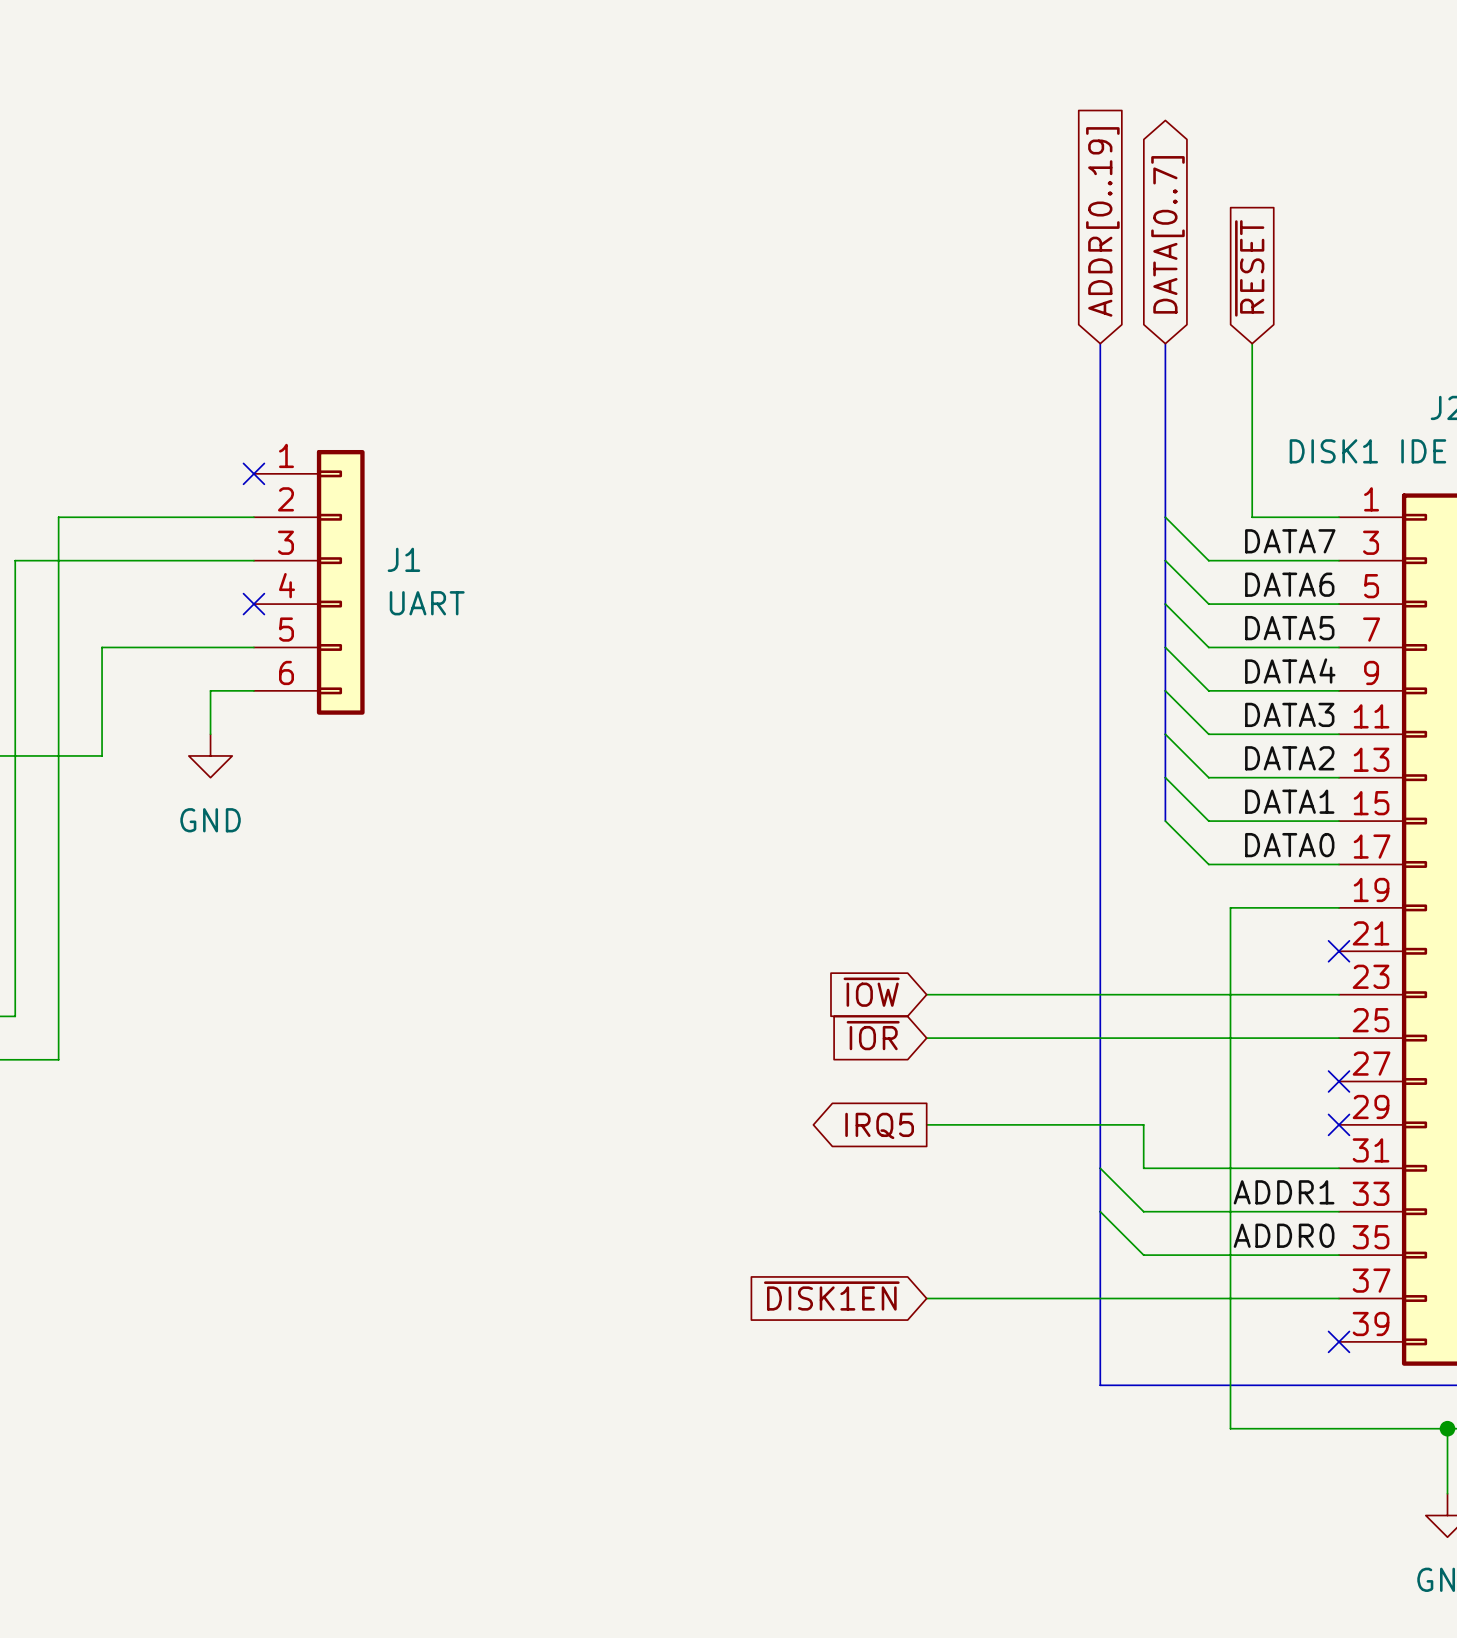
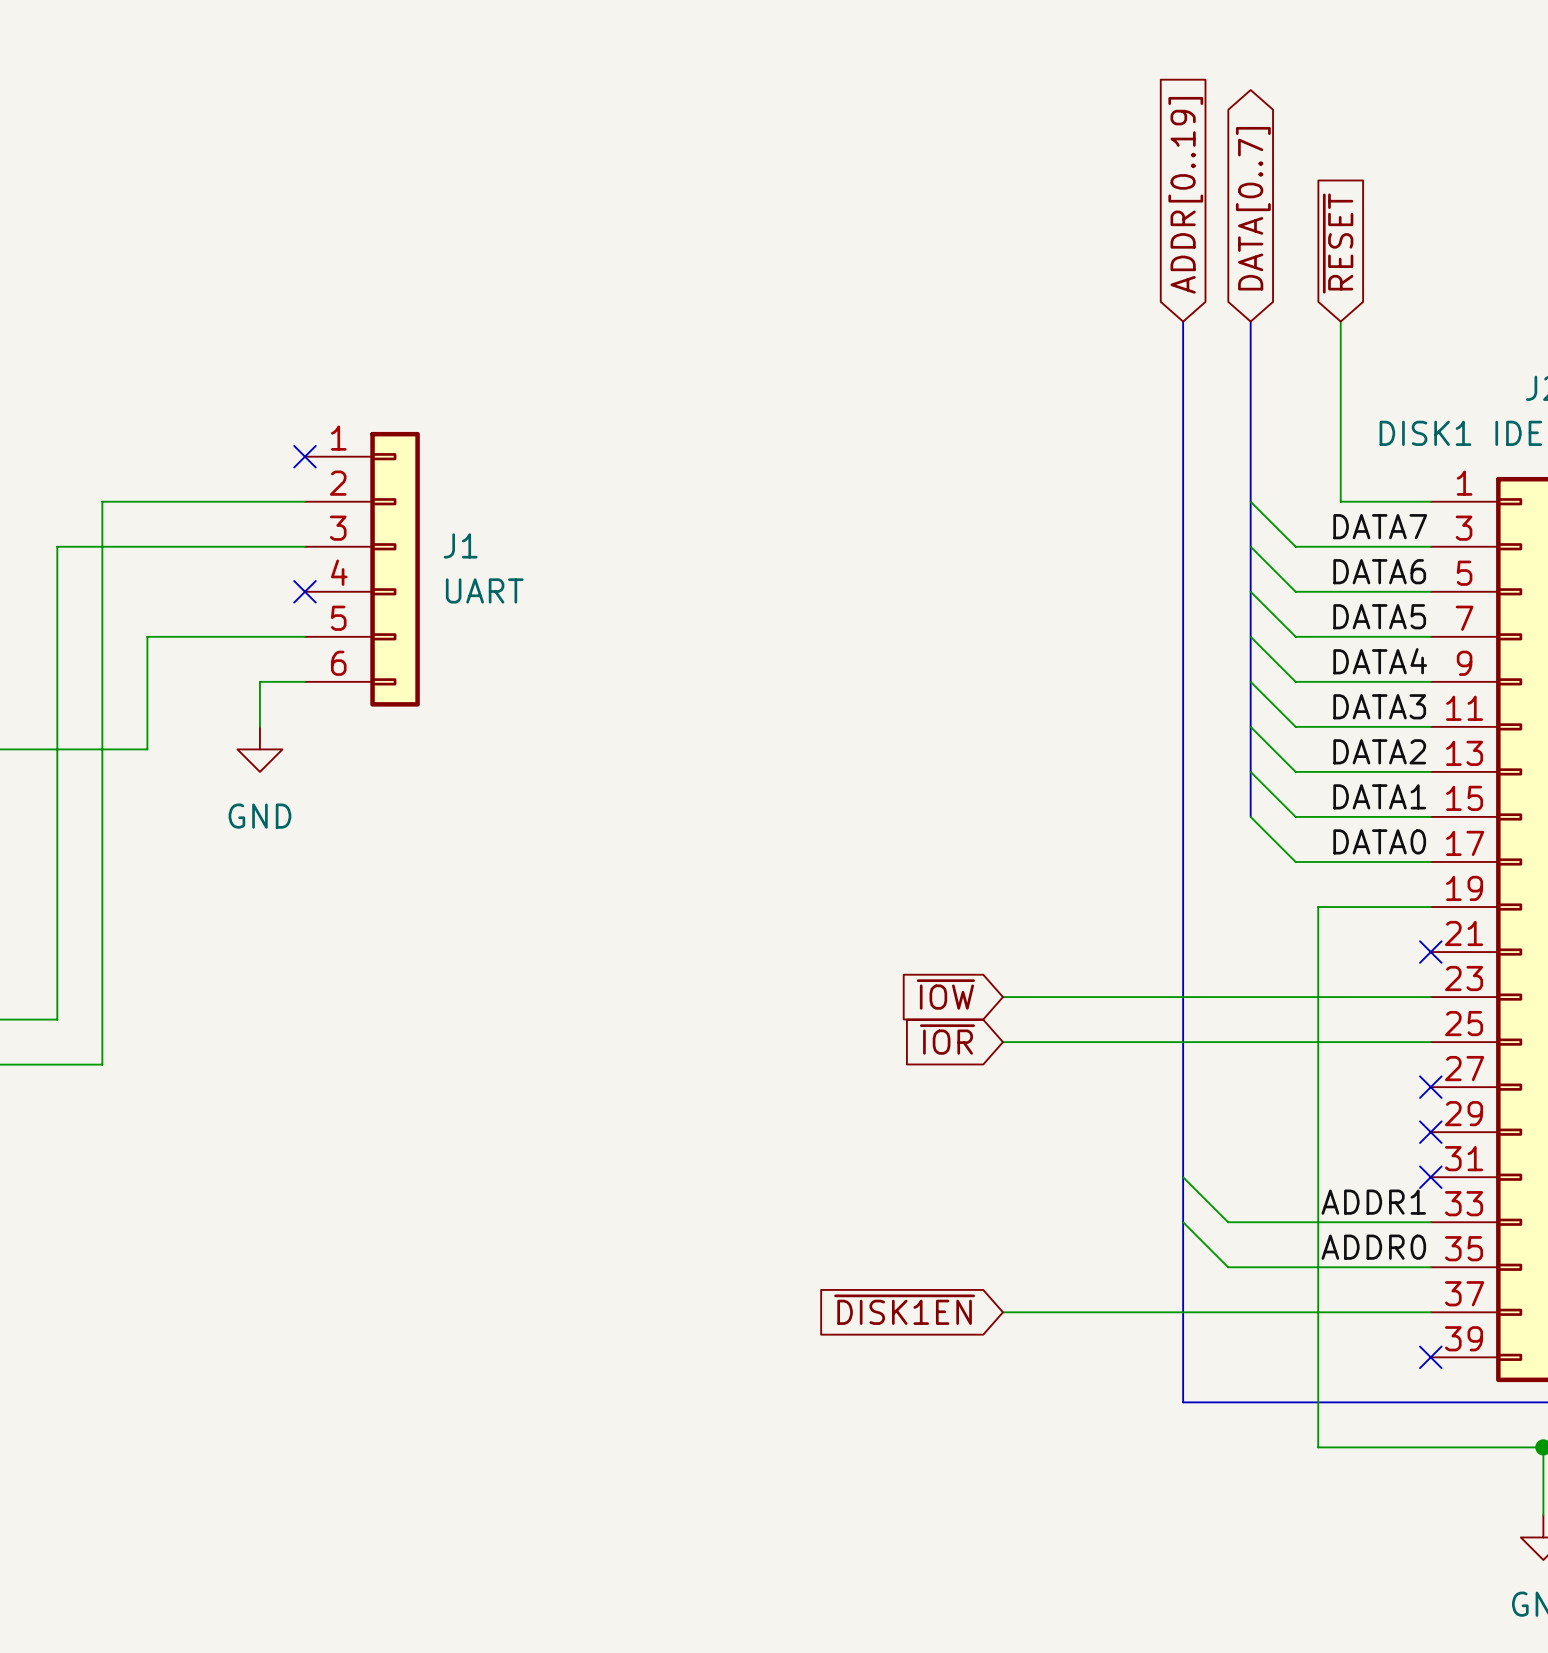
wire: (926, 1124) (1143, 1124) (1143, 1168) (1339, 1168) -> none
global label: IRQ5 (879, 1125) -> none
no-connect mark: none -> (1430, 1177)

